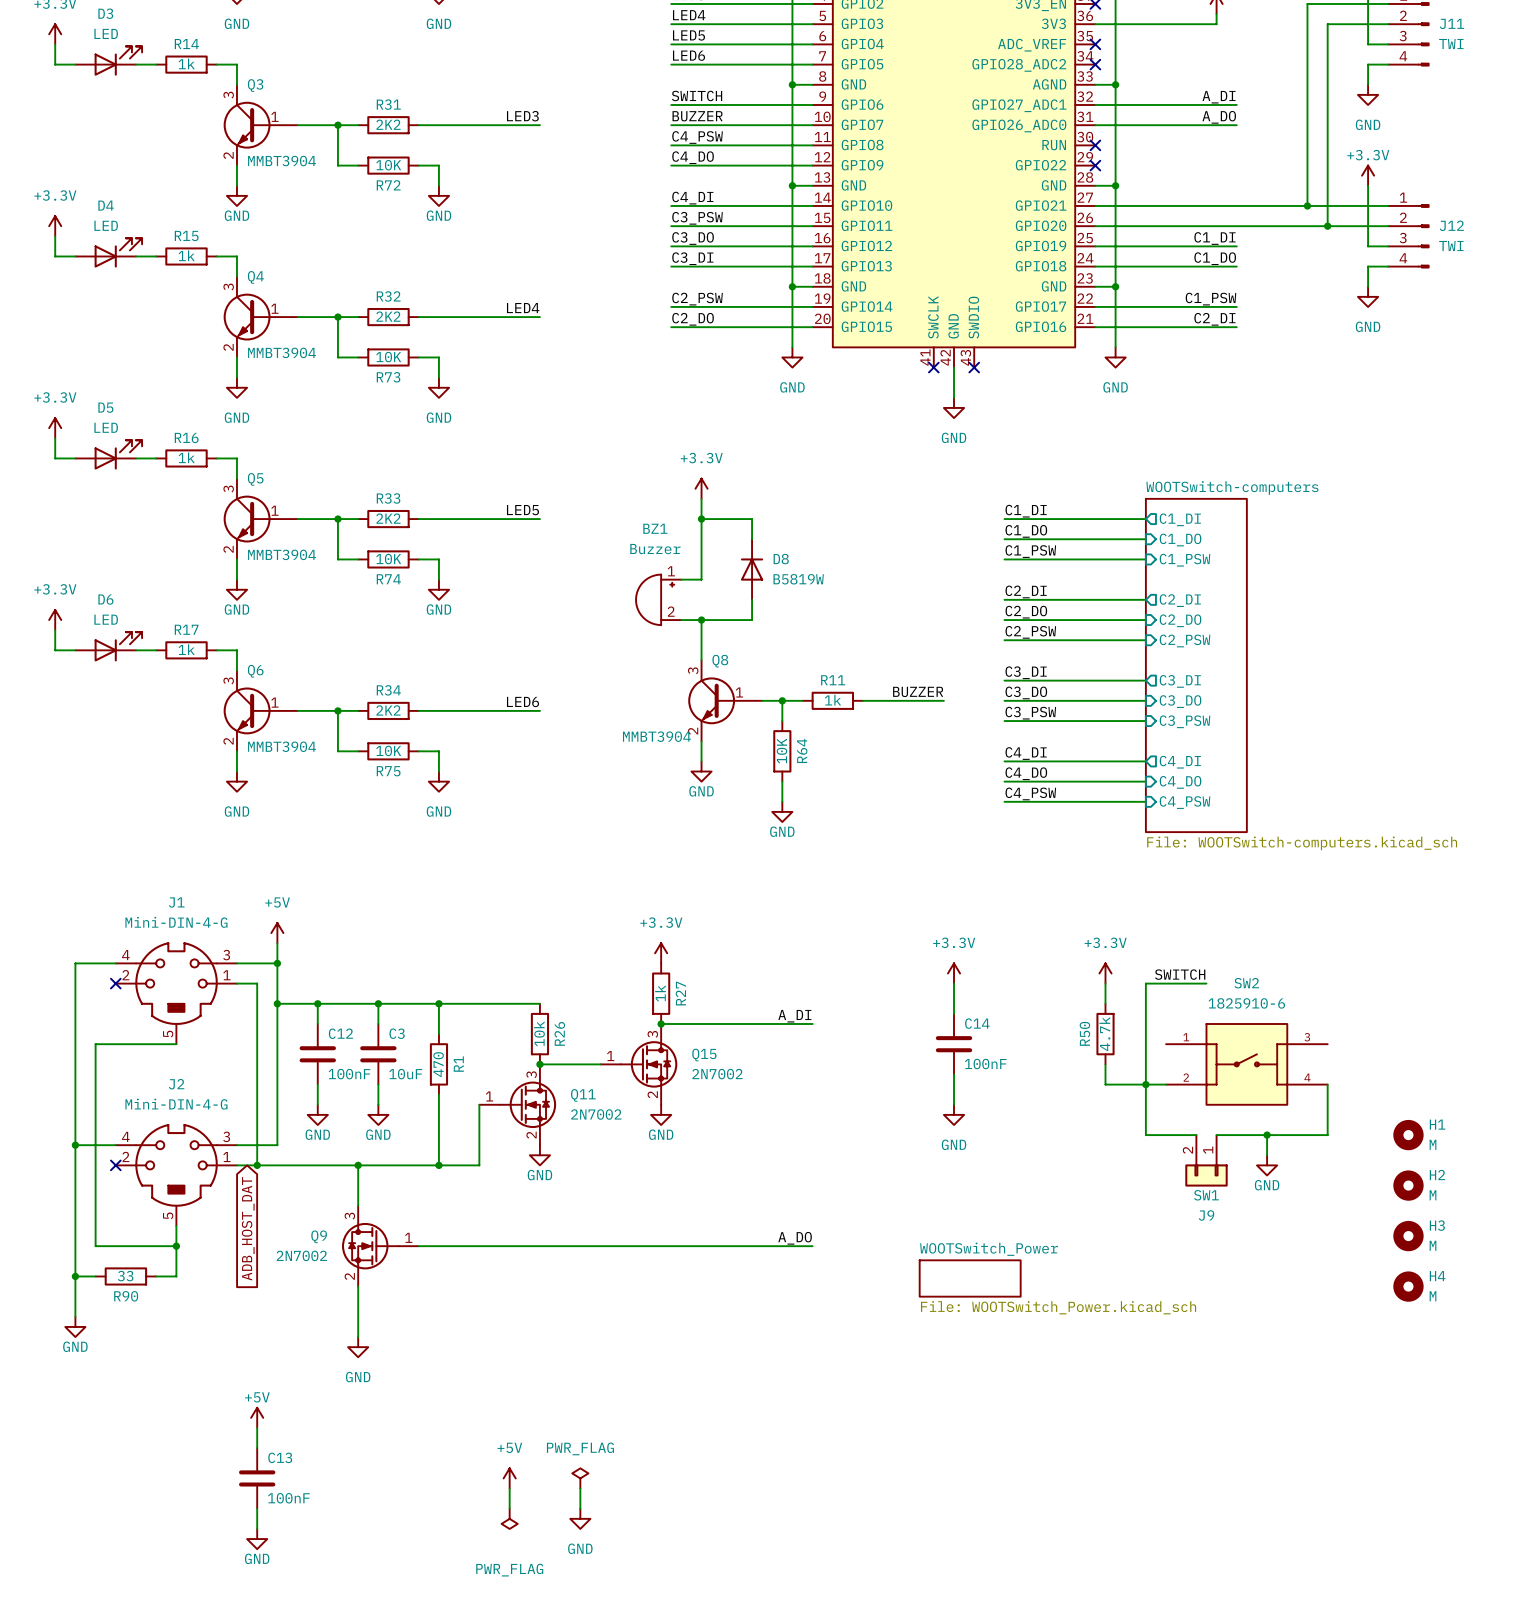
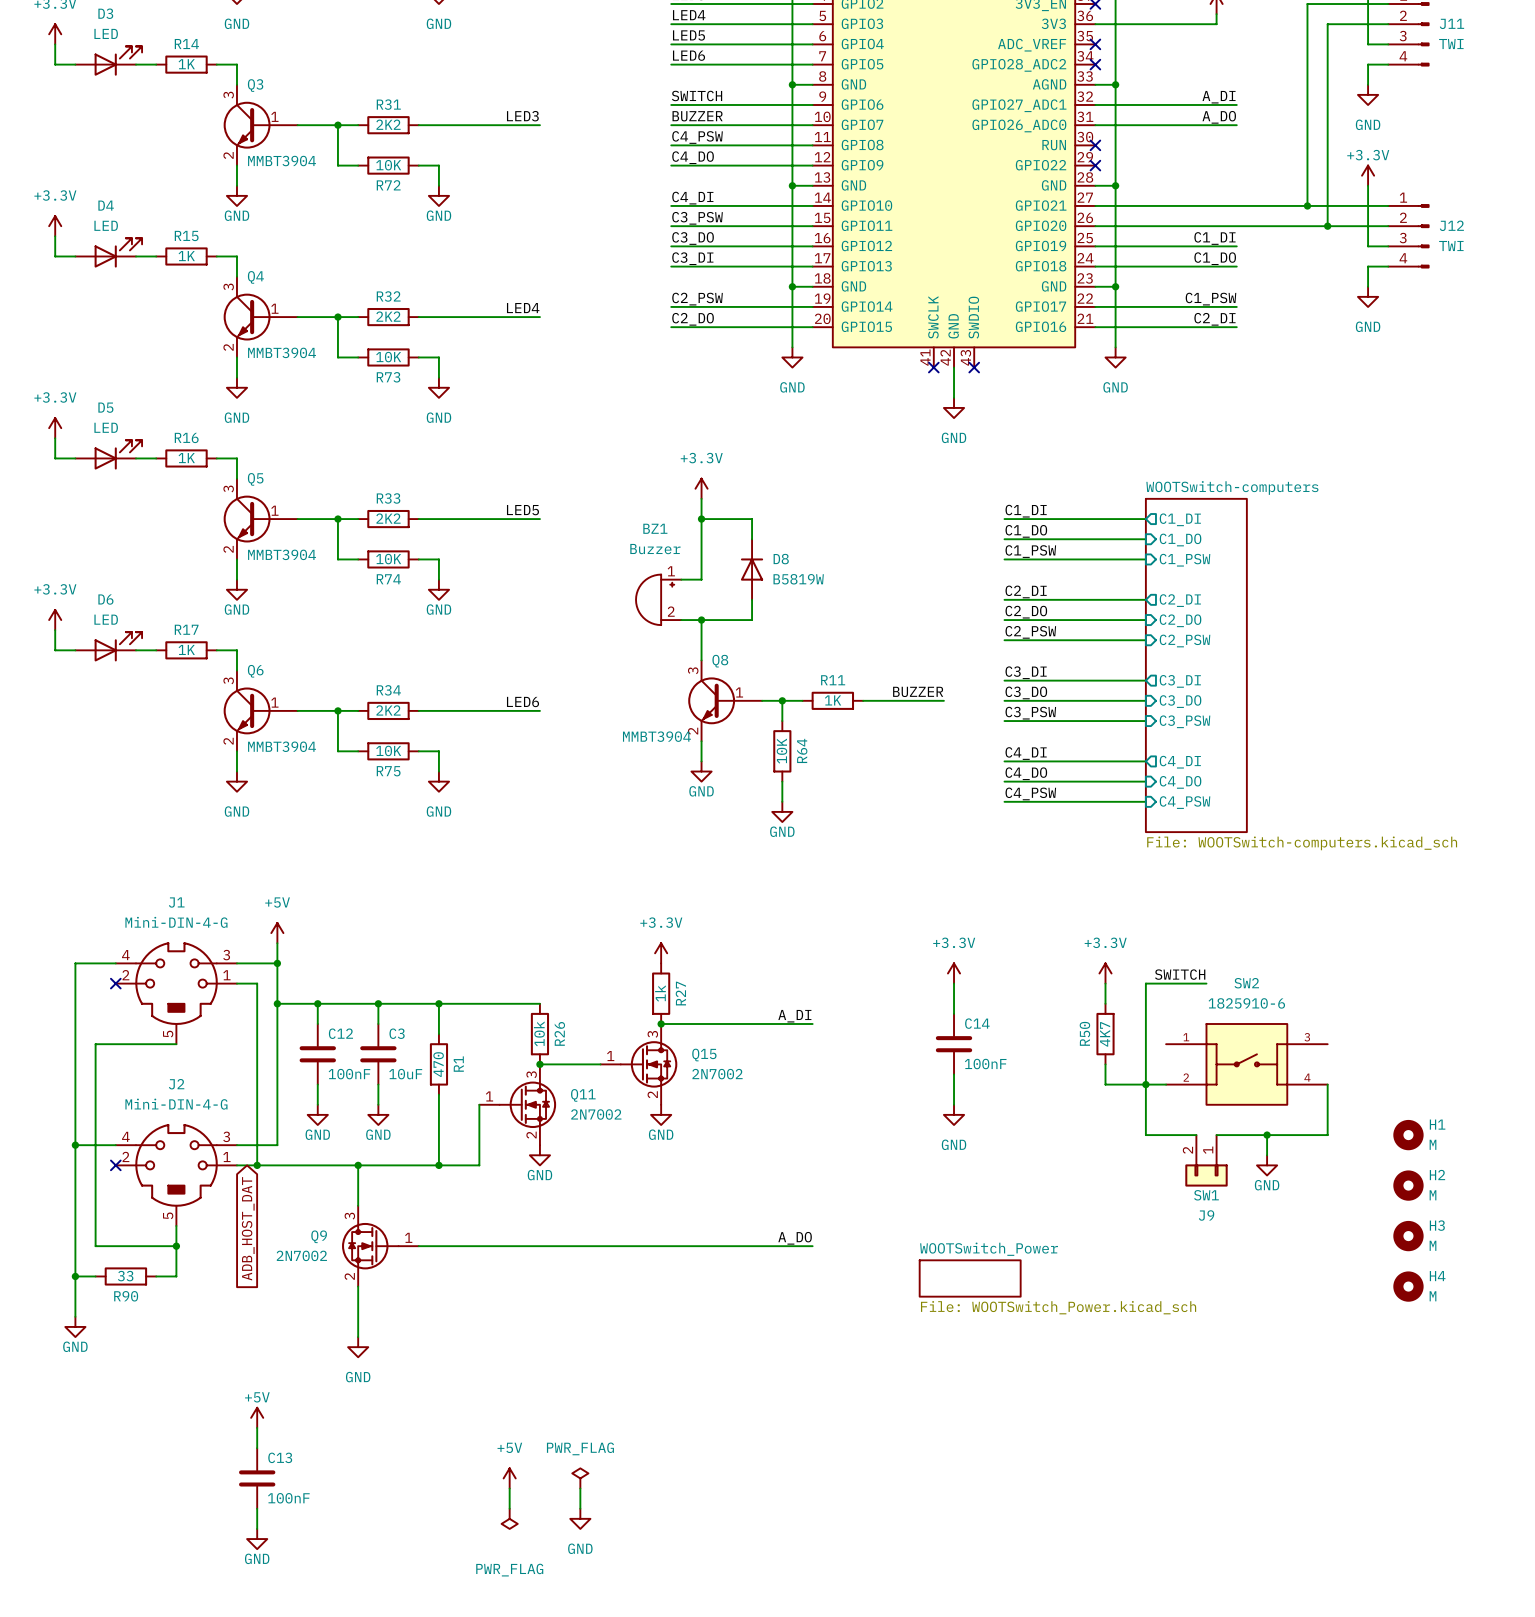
R14 value: 1k (186, 63) -> 1K (186, 64)
R15 value: 1k (186, 255) -> 1K (186, 256)
R16 value: 1k (186, 457) -> 1K (186, 458)
R17 value: 1k (186, 649) -> 1K (186, 649)
R11 value: 1k (833, 700) -> 1K (833, 700)
R50 value: 4.7k (1104, 1034) -> 4K7 (1105, 1034)

